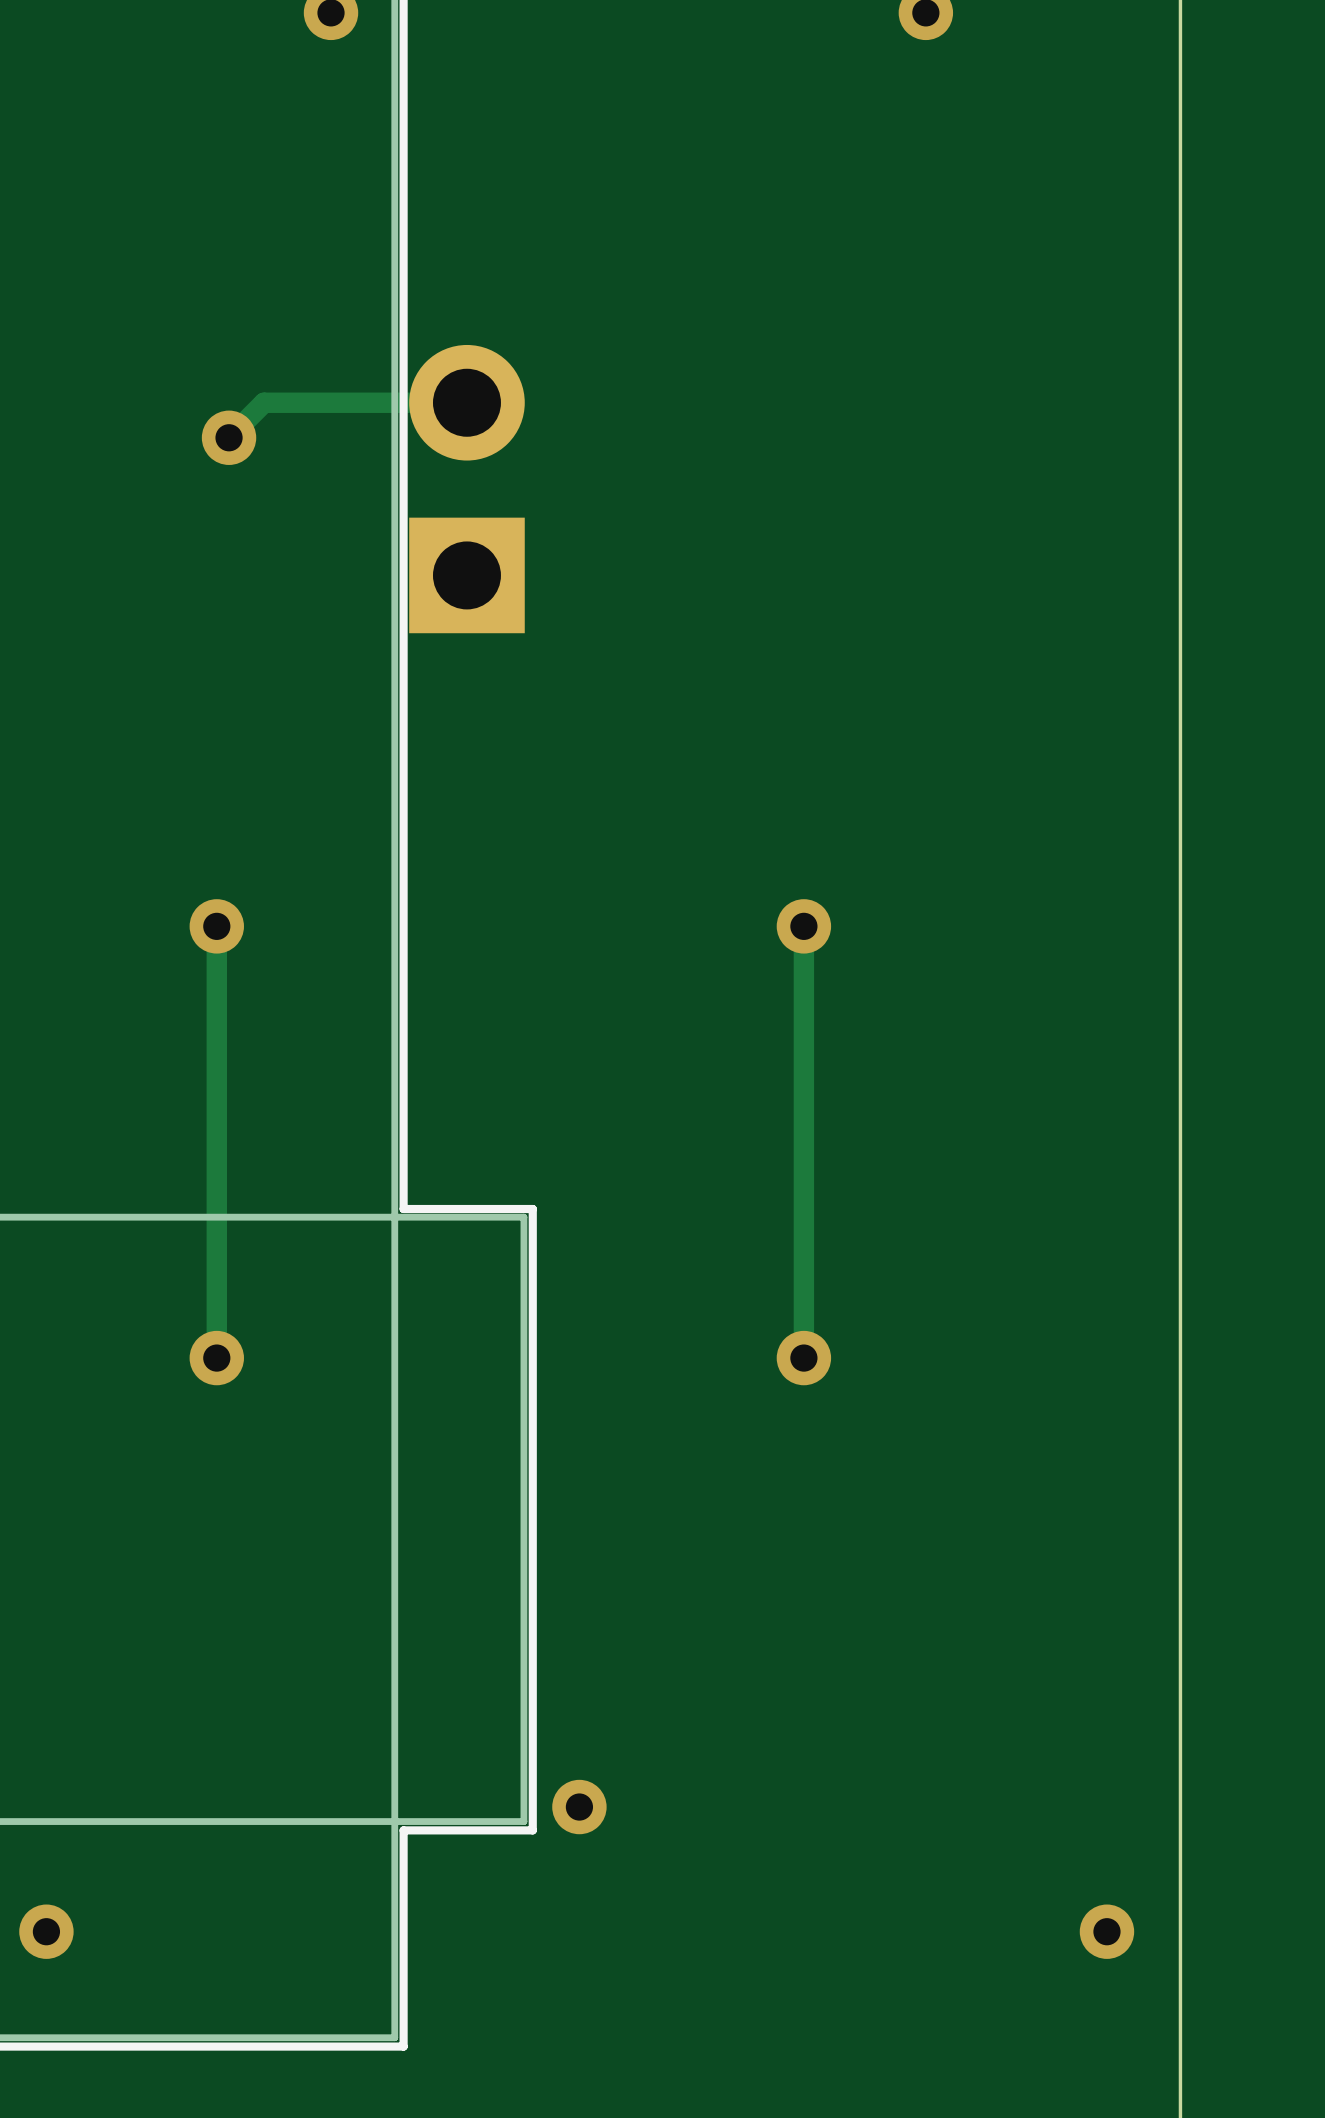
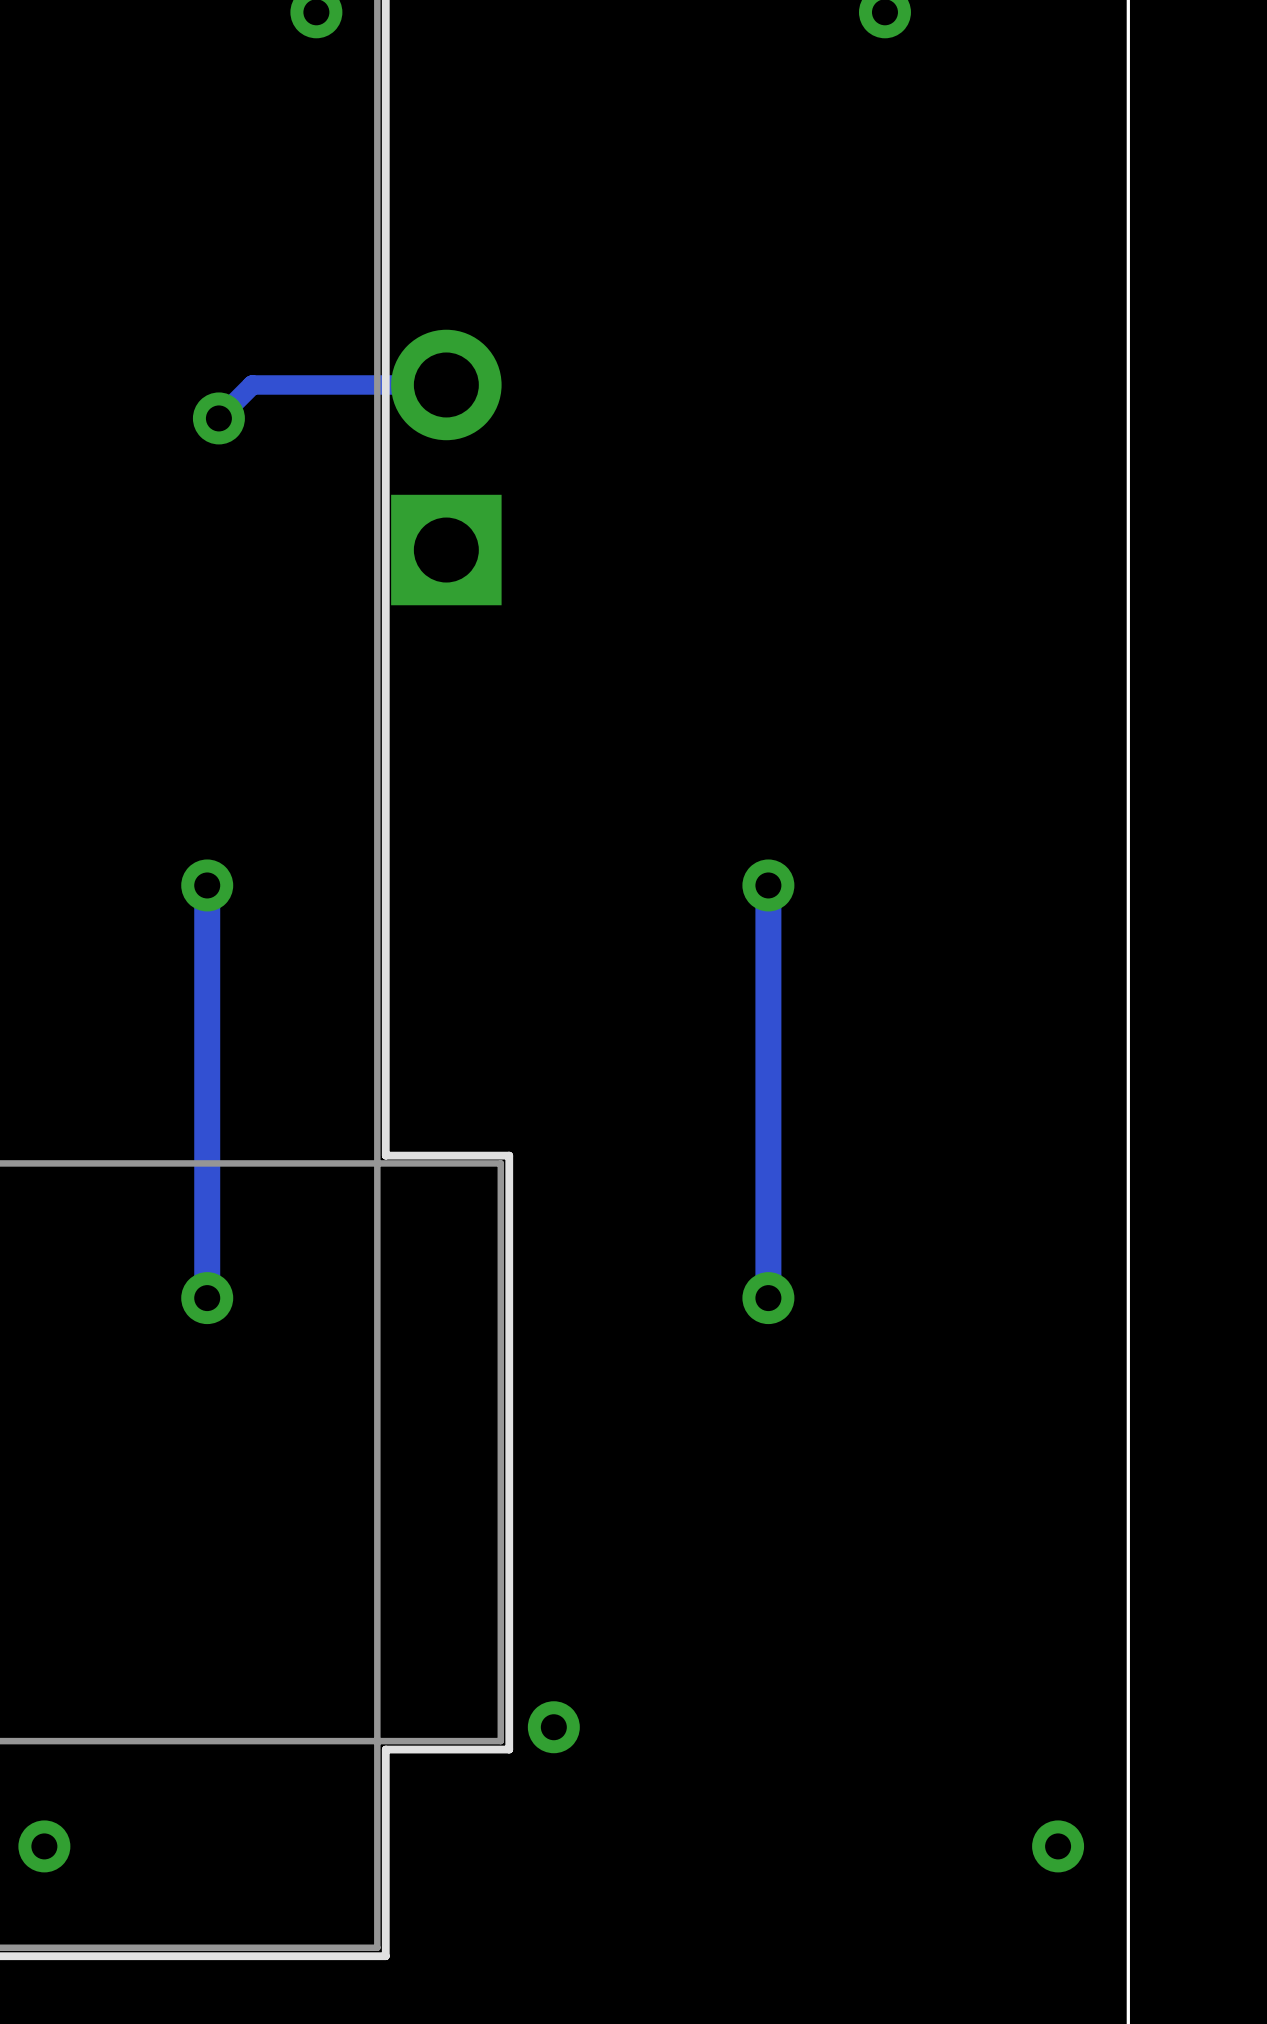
track width: thin (216, 926) (216, 1358) -> thick (207, 885) (207, 1298)
track width: thin (803, 926) (803, 1358) -> thick (768, 885) (768, 1298)

